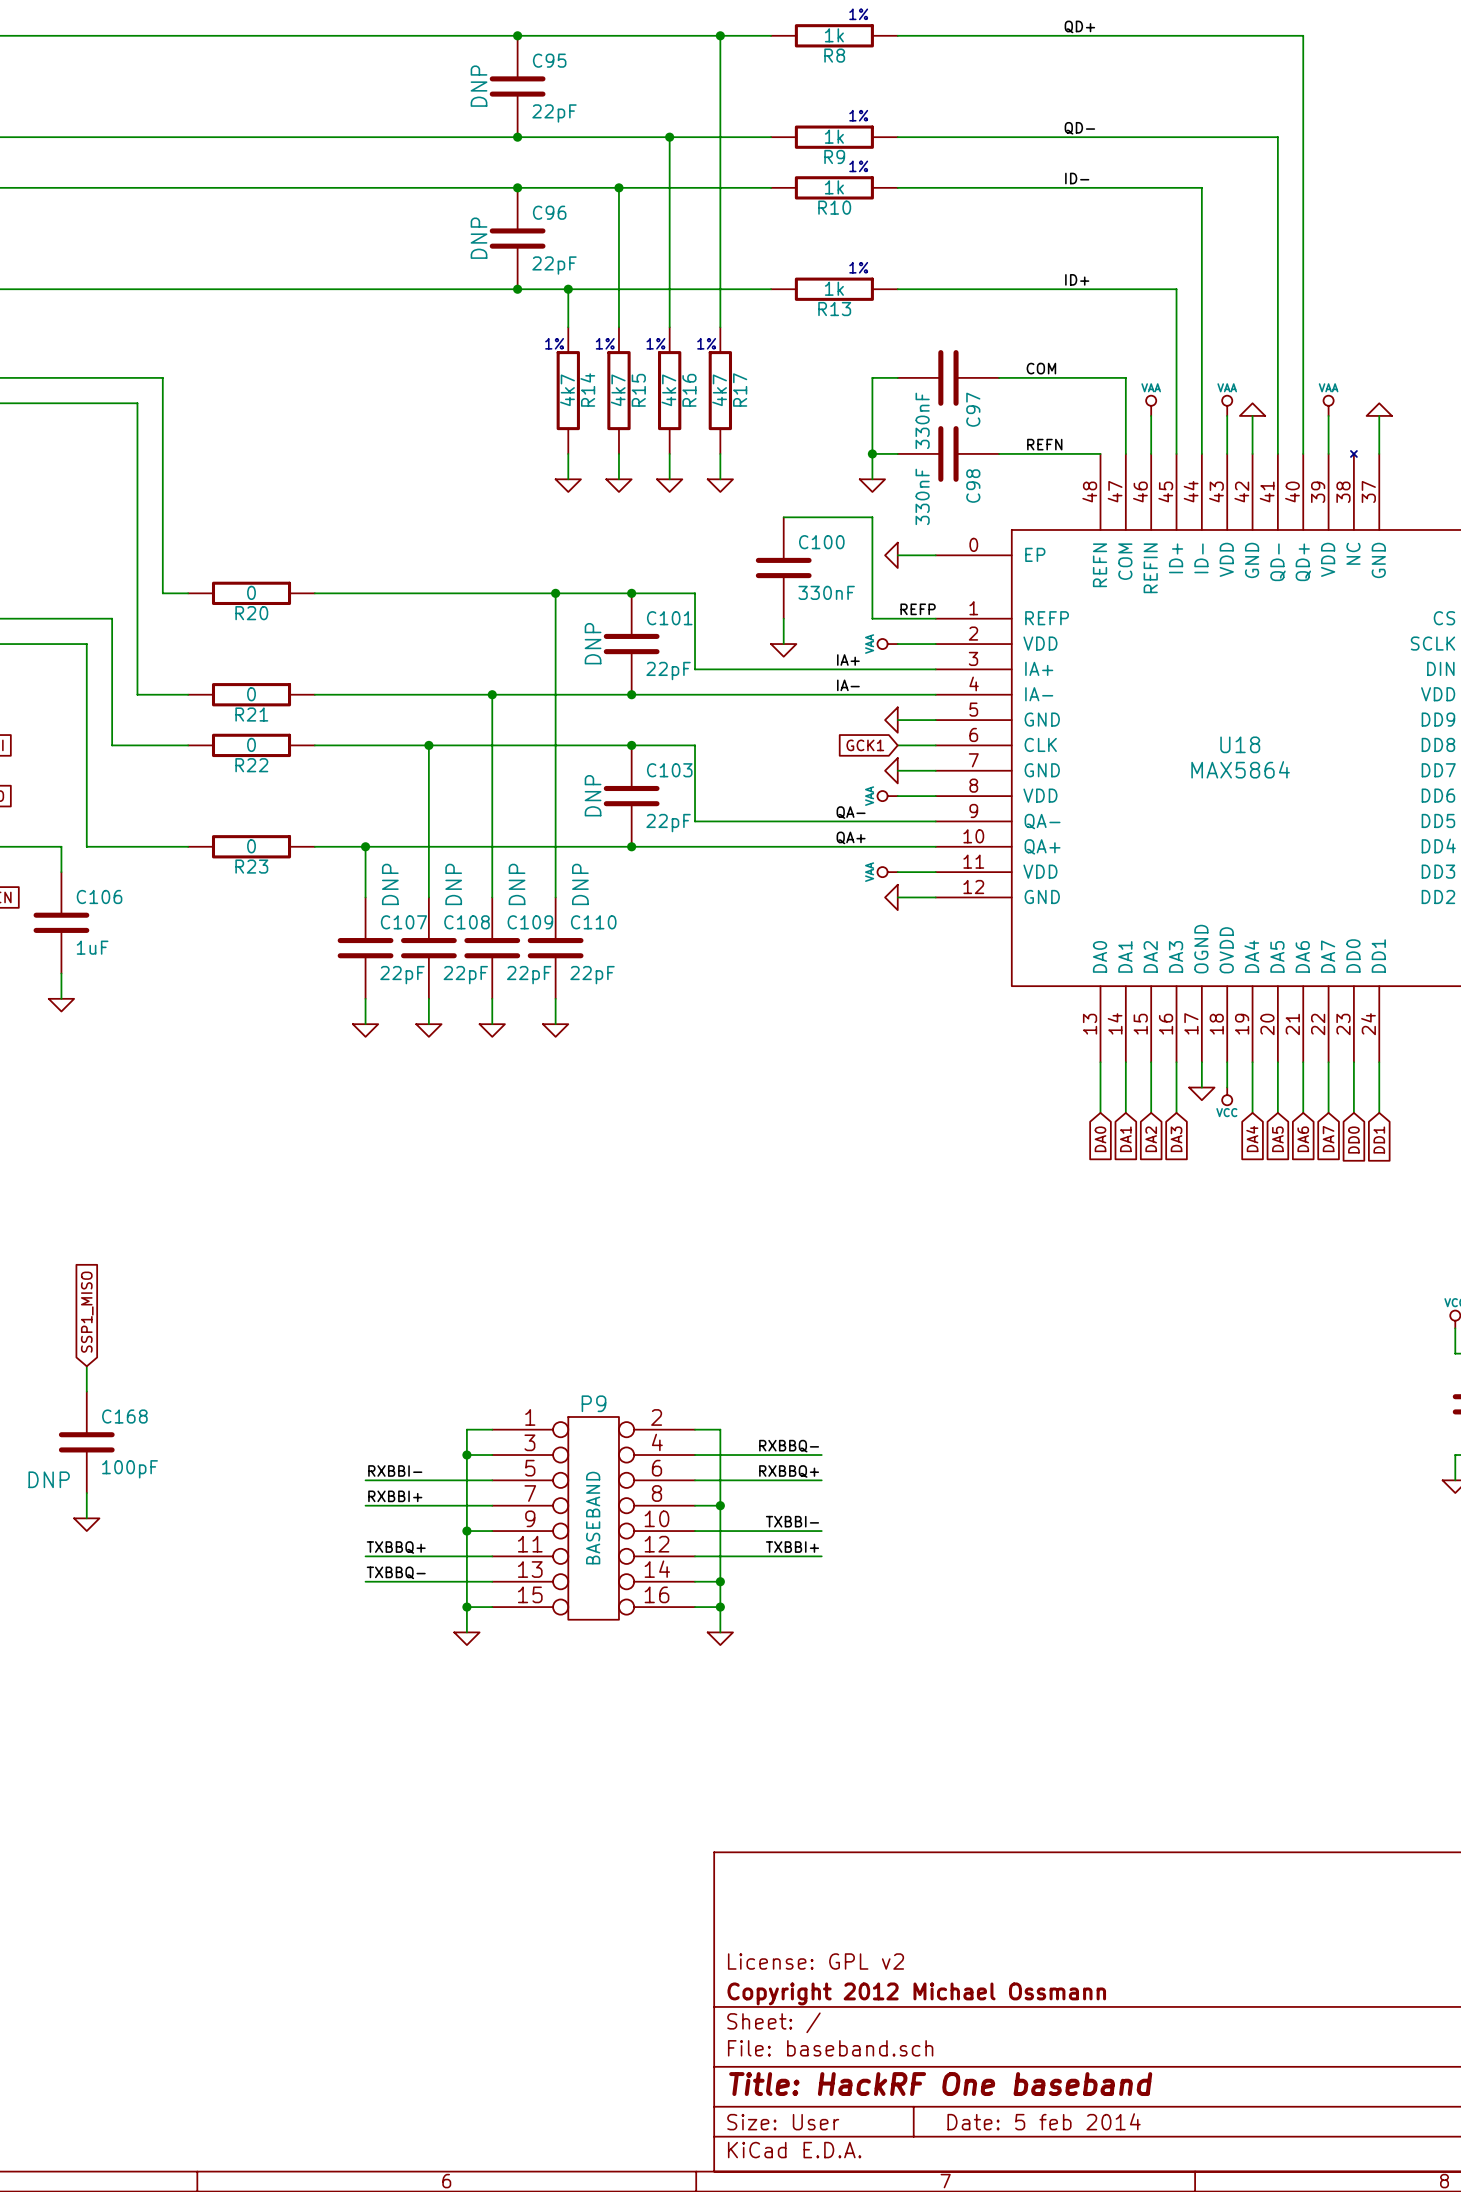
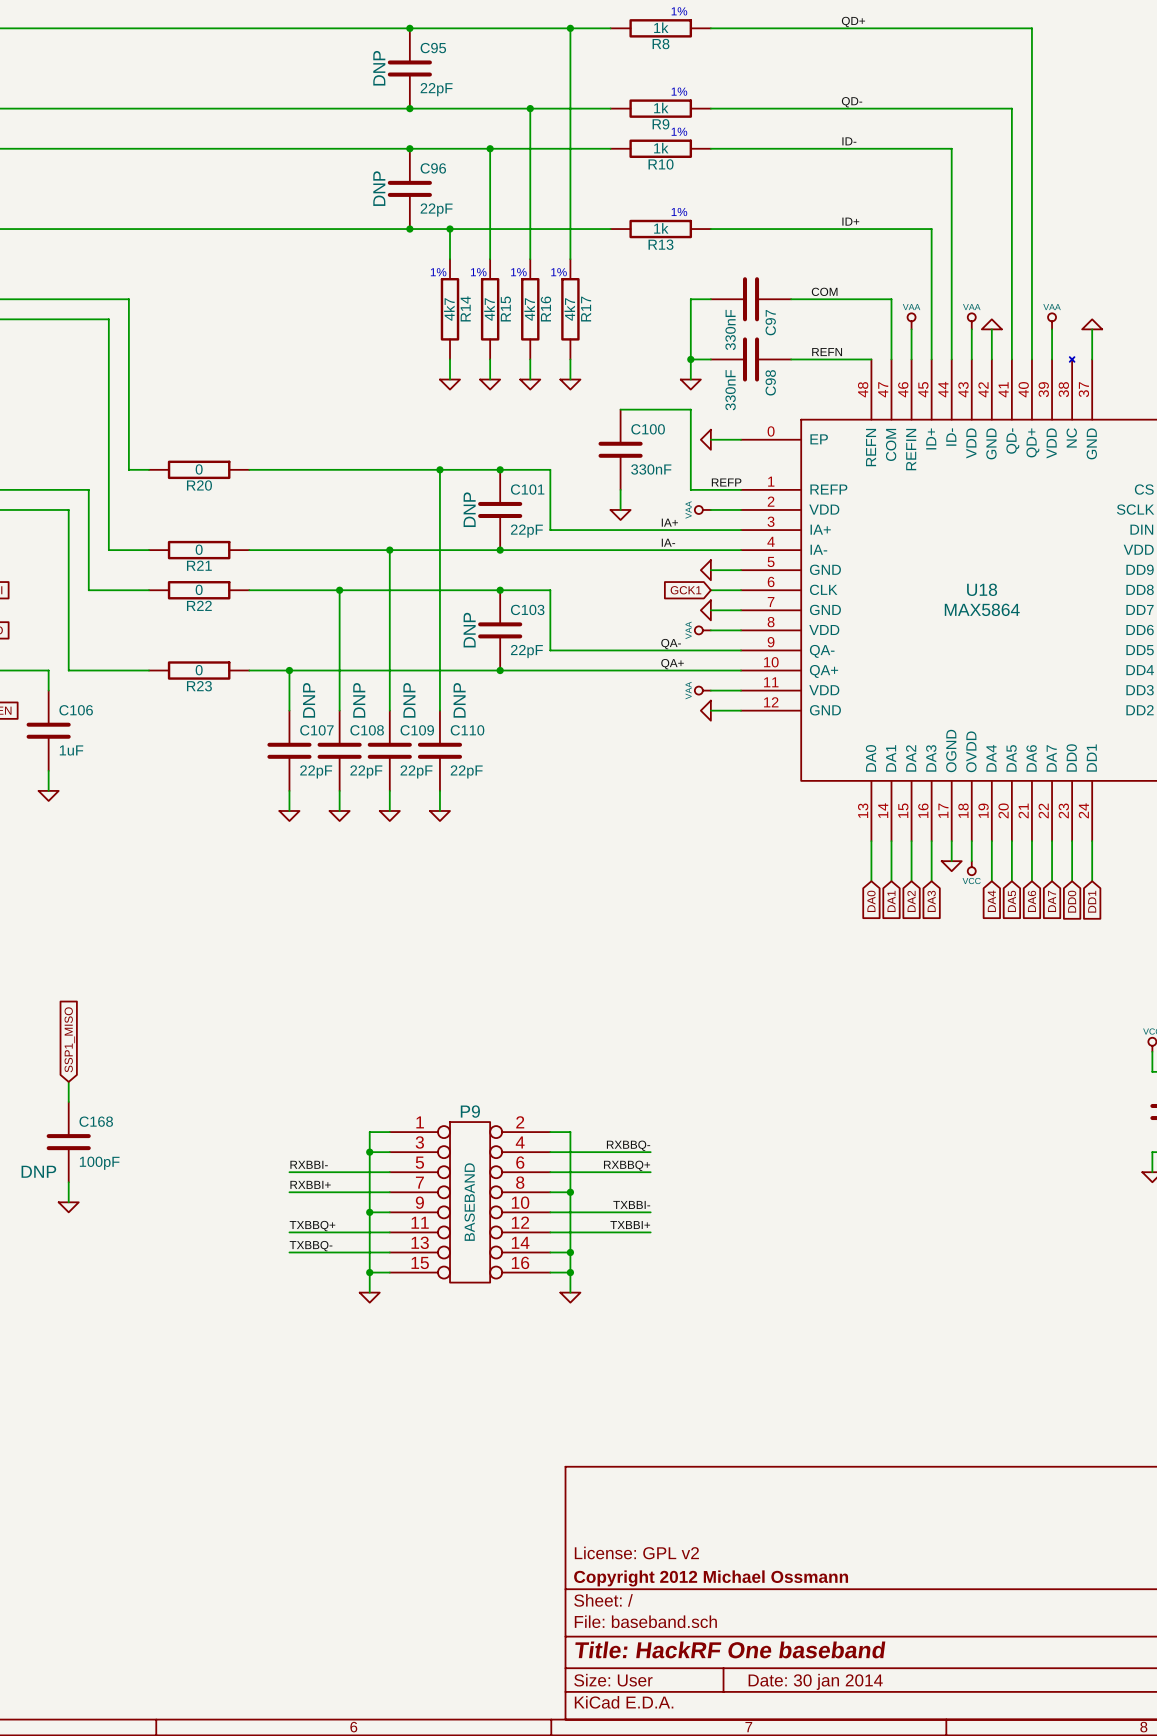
title block: Date: 5 feb 2014 (1044, 2121) -> Date: 30 jan 2014 (815, 1681)

